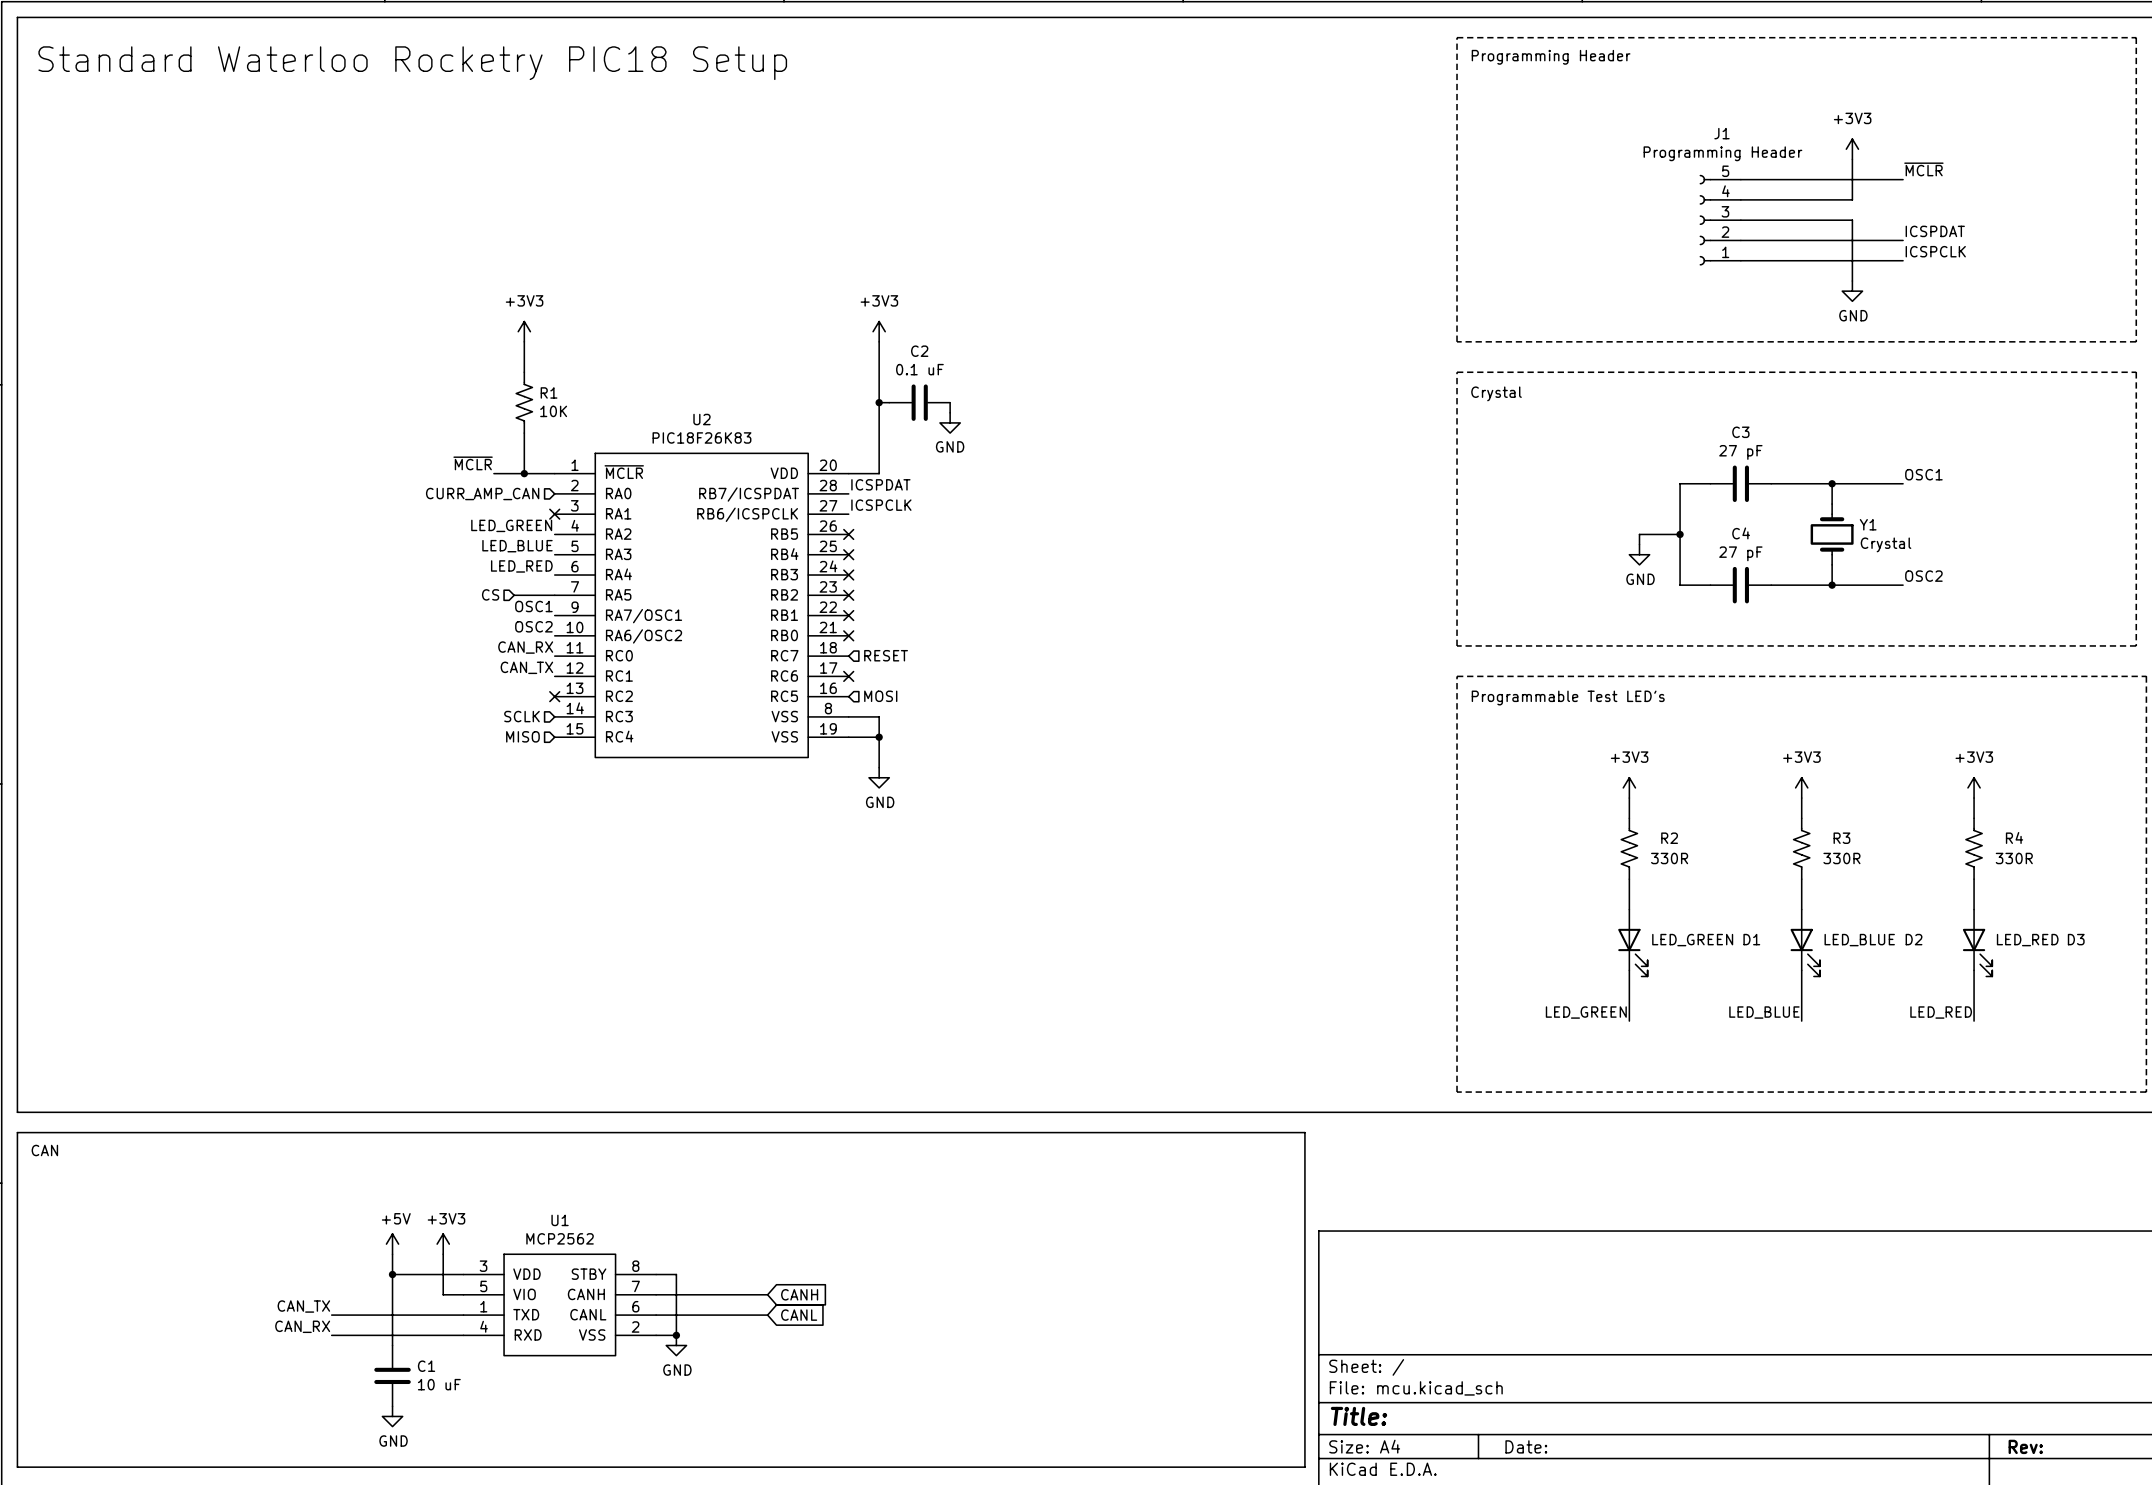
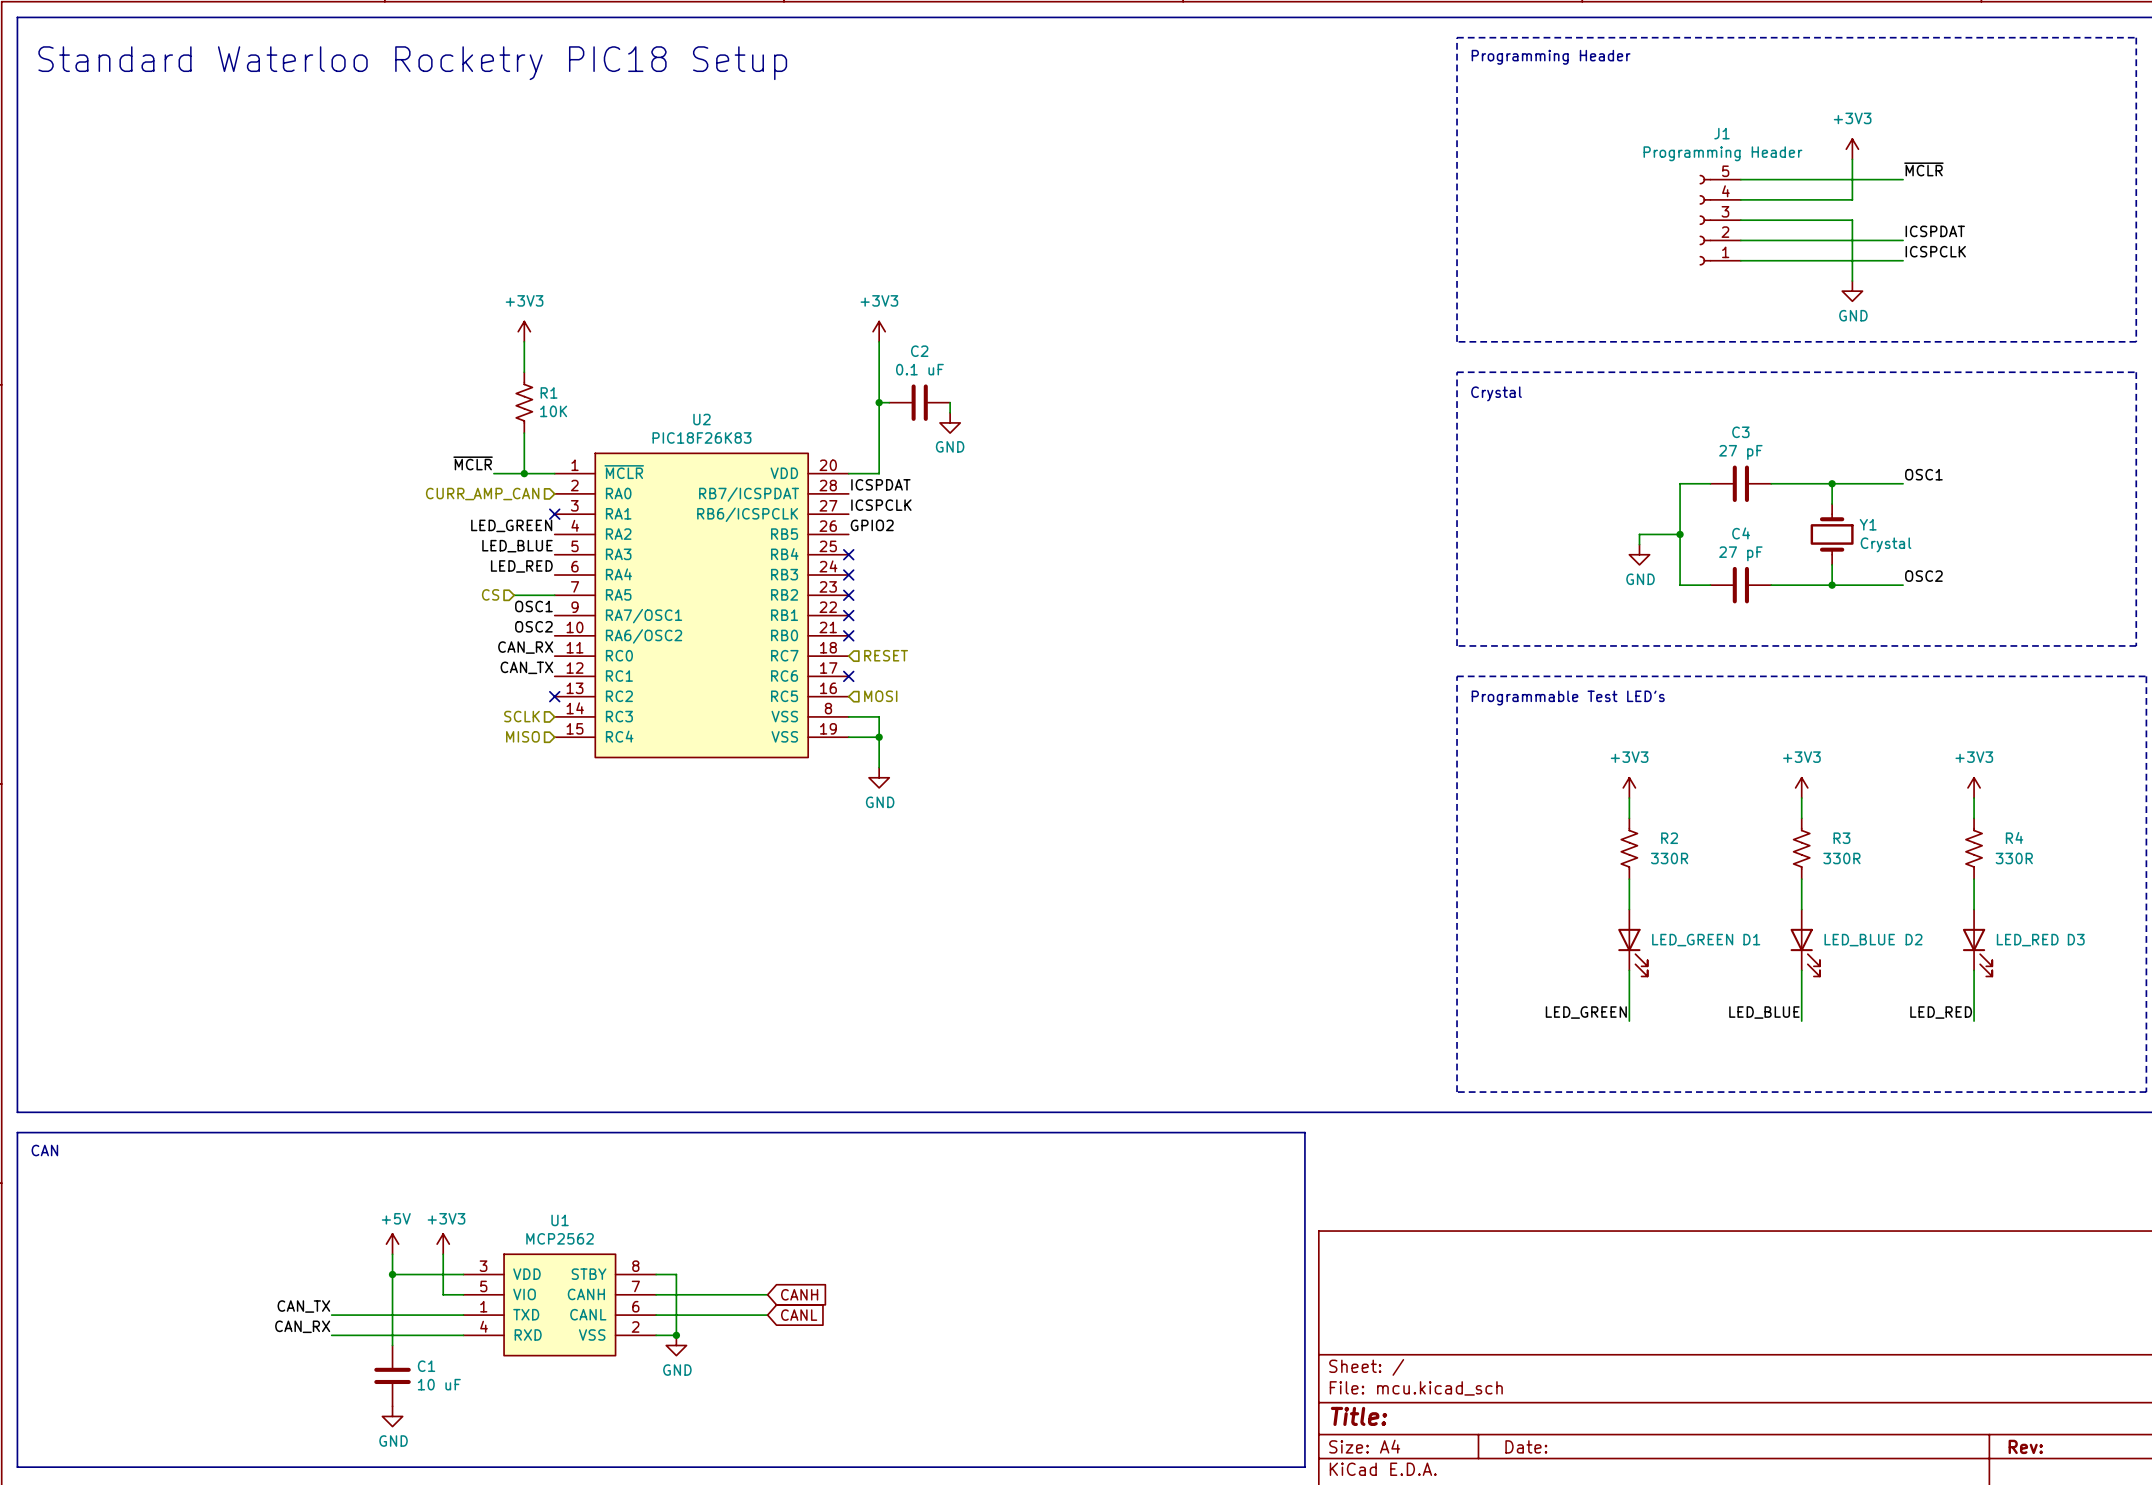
label: none -> GPIO2 (872, 525)
no-connect mark: (848, 534) -> none

